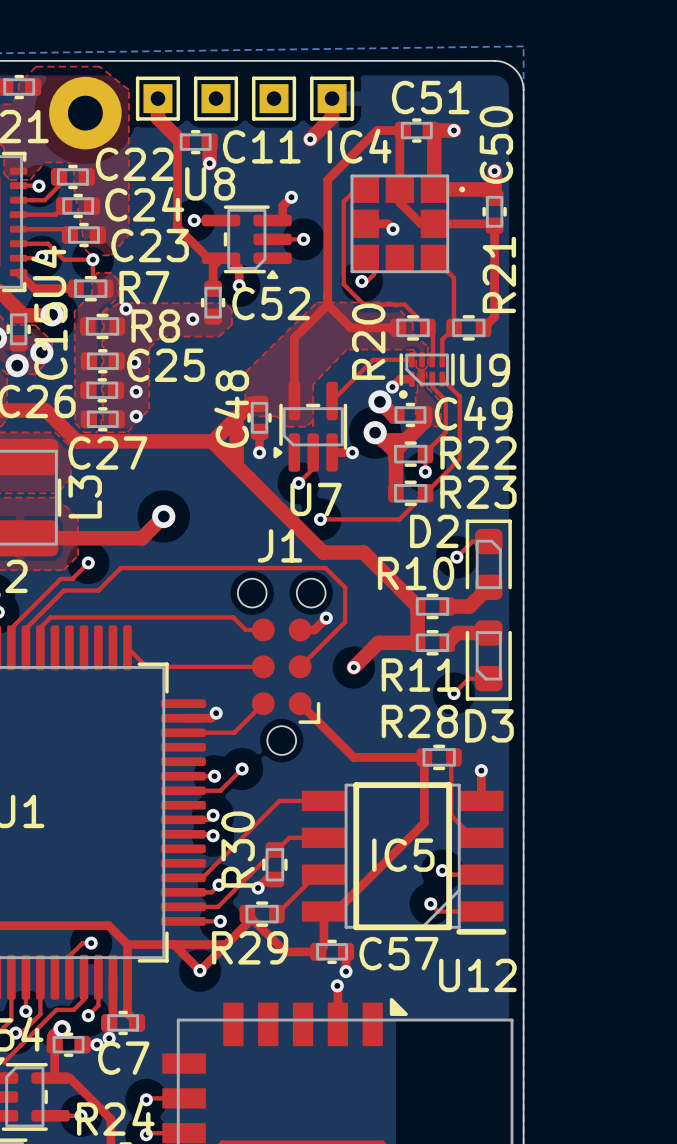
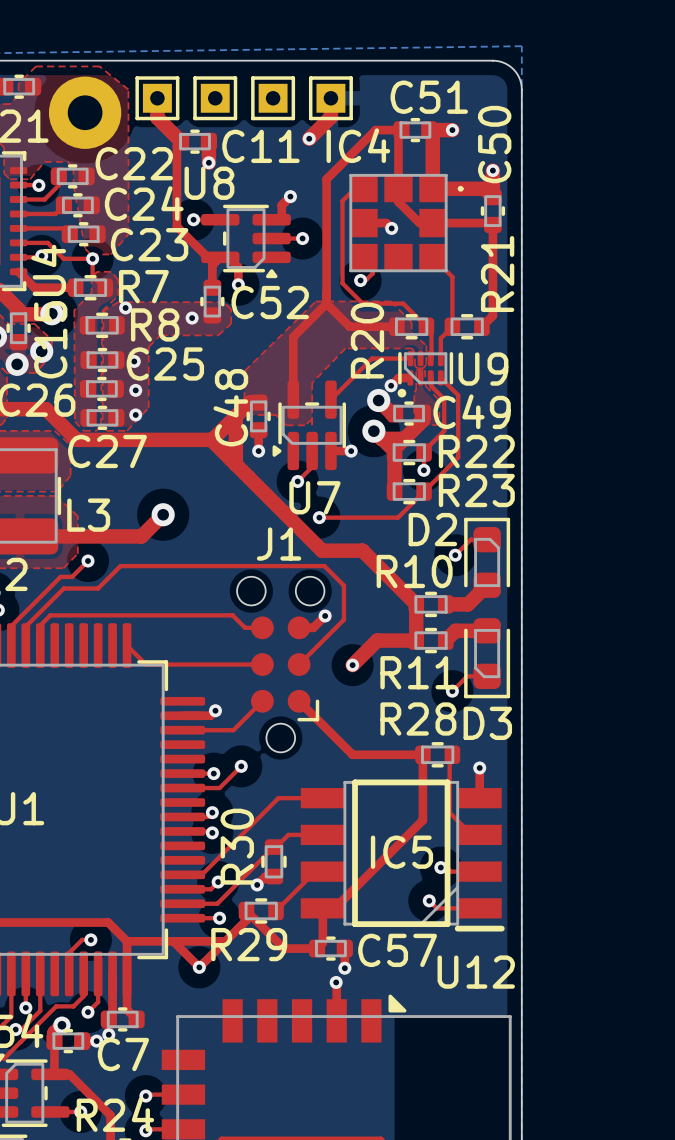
L3 name rotation: 0° (85, 496) -> 90° clockwise (88, 515)

